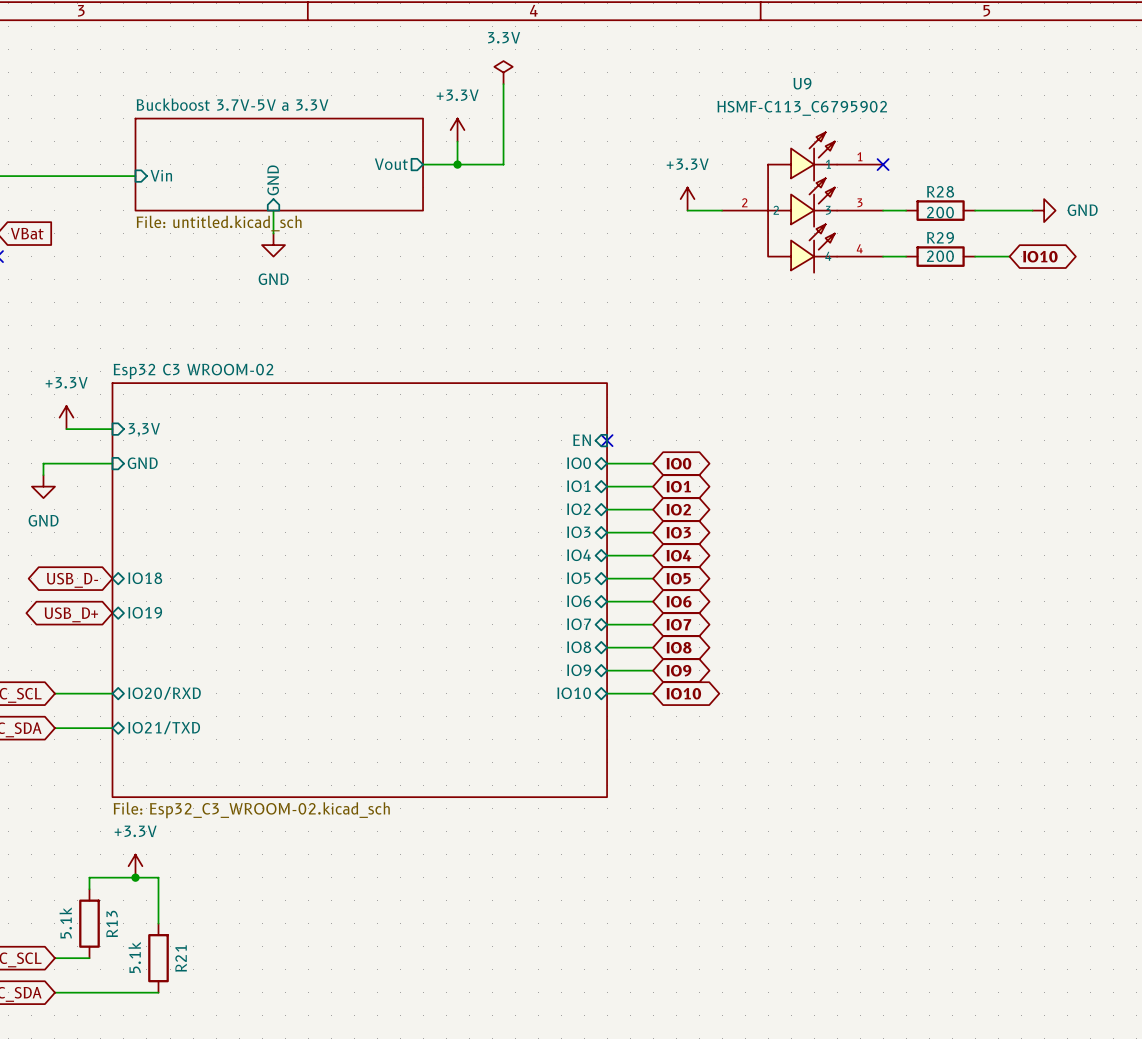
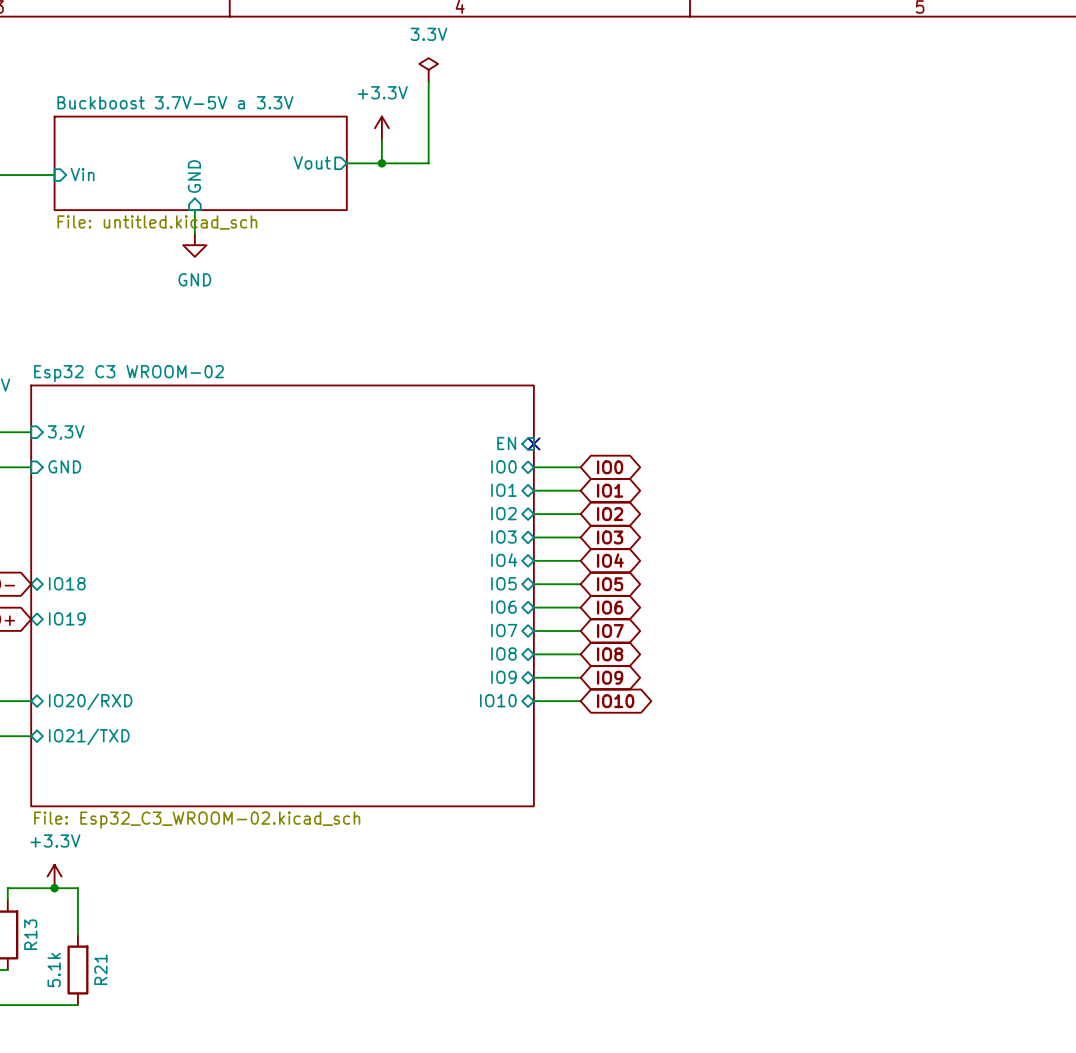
no-connect mark: (883, 164) -> none
power symbol: +3.3V (687, 199) -> none
U9: HSMF-C113_C6795902 (802, 202) -> none
wire: (687, 210) (722, 210) -> none
wire: (883, 210) (906, 210) -> none
R28: 200 (940, 210) -> none
wire: (975, 210) (1032, 210) -> none
power symbol: GND (1044, 210) -> none
wire: (883, 256) (906, 256) -> none
R29: 200 (940, 256) -> none
wire: (975, 256) (1009, 256) -> none
global label: IO10 (1040, 256) -> none

